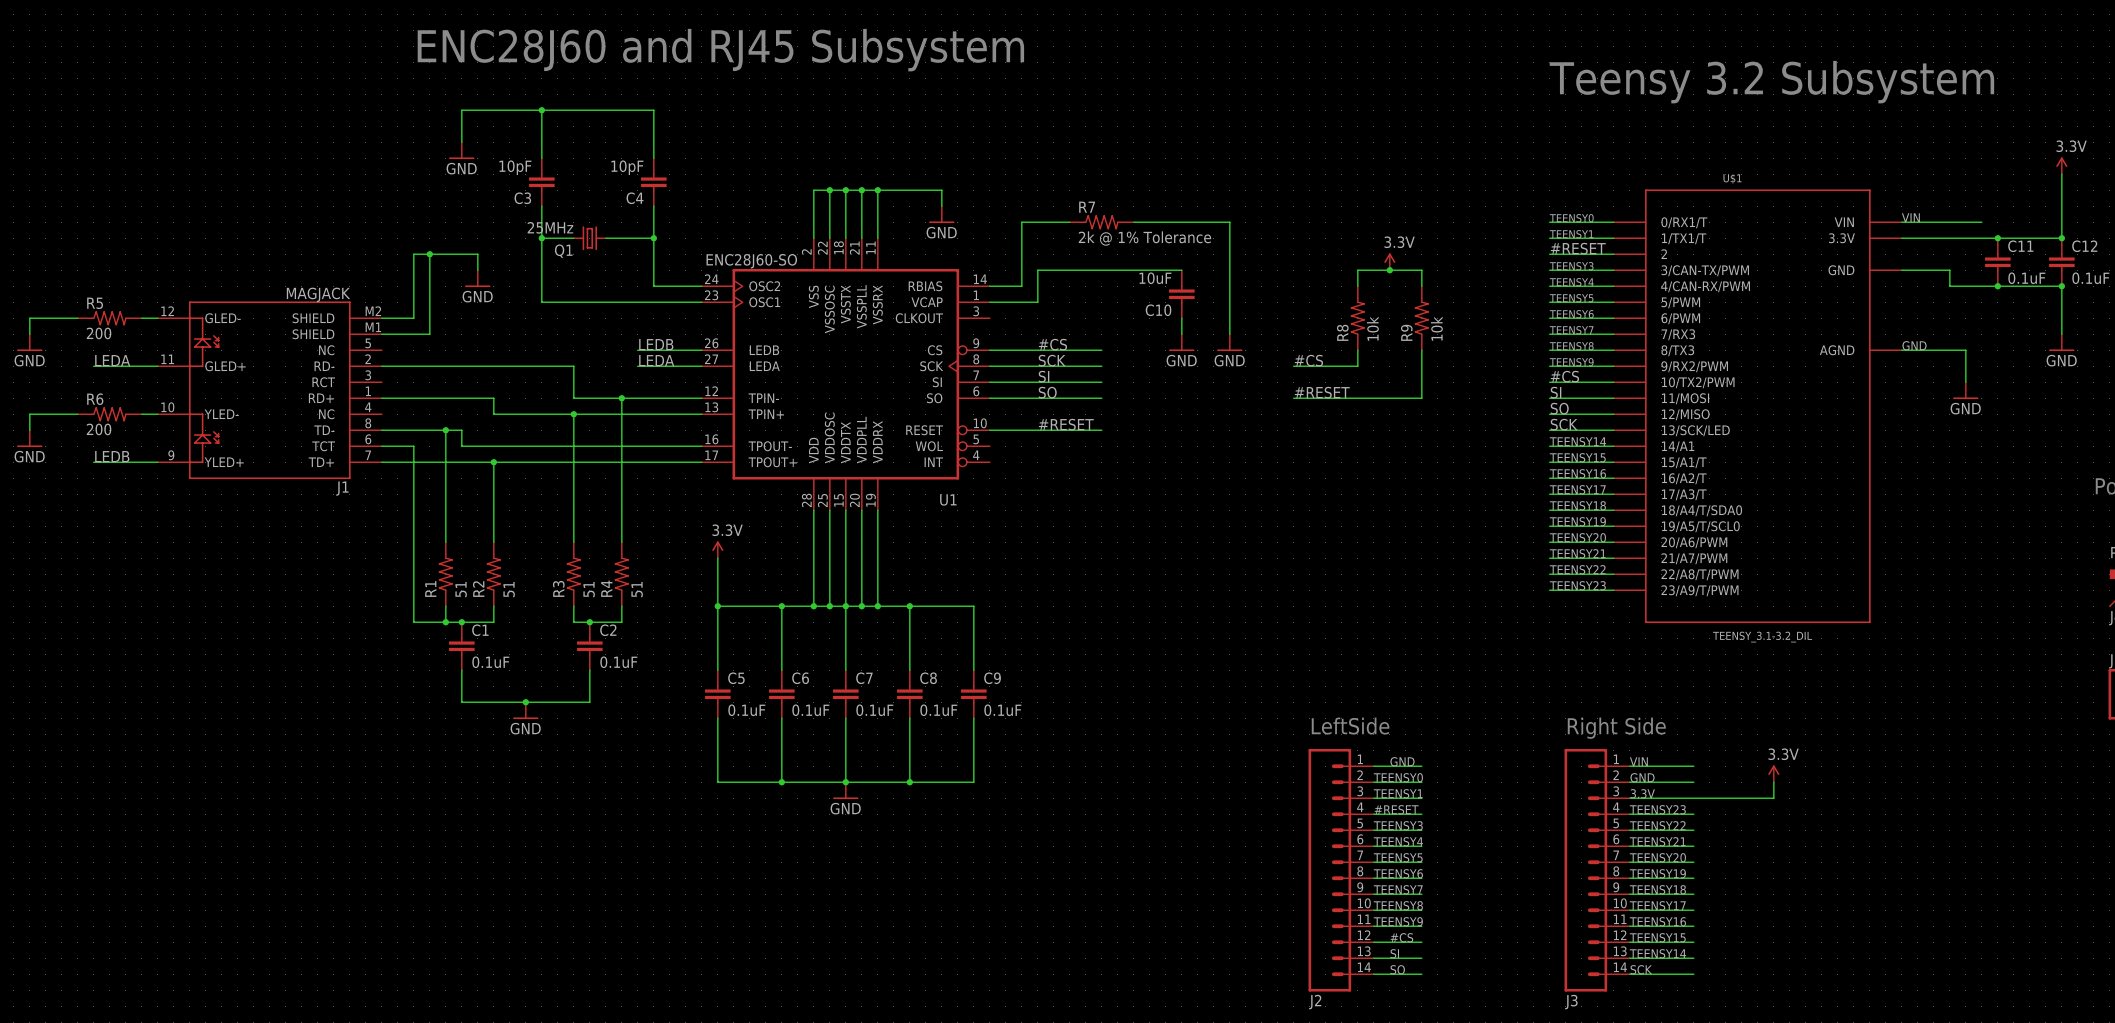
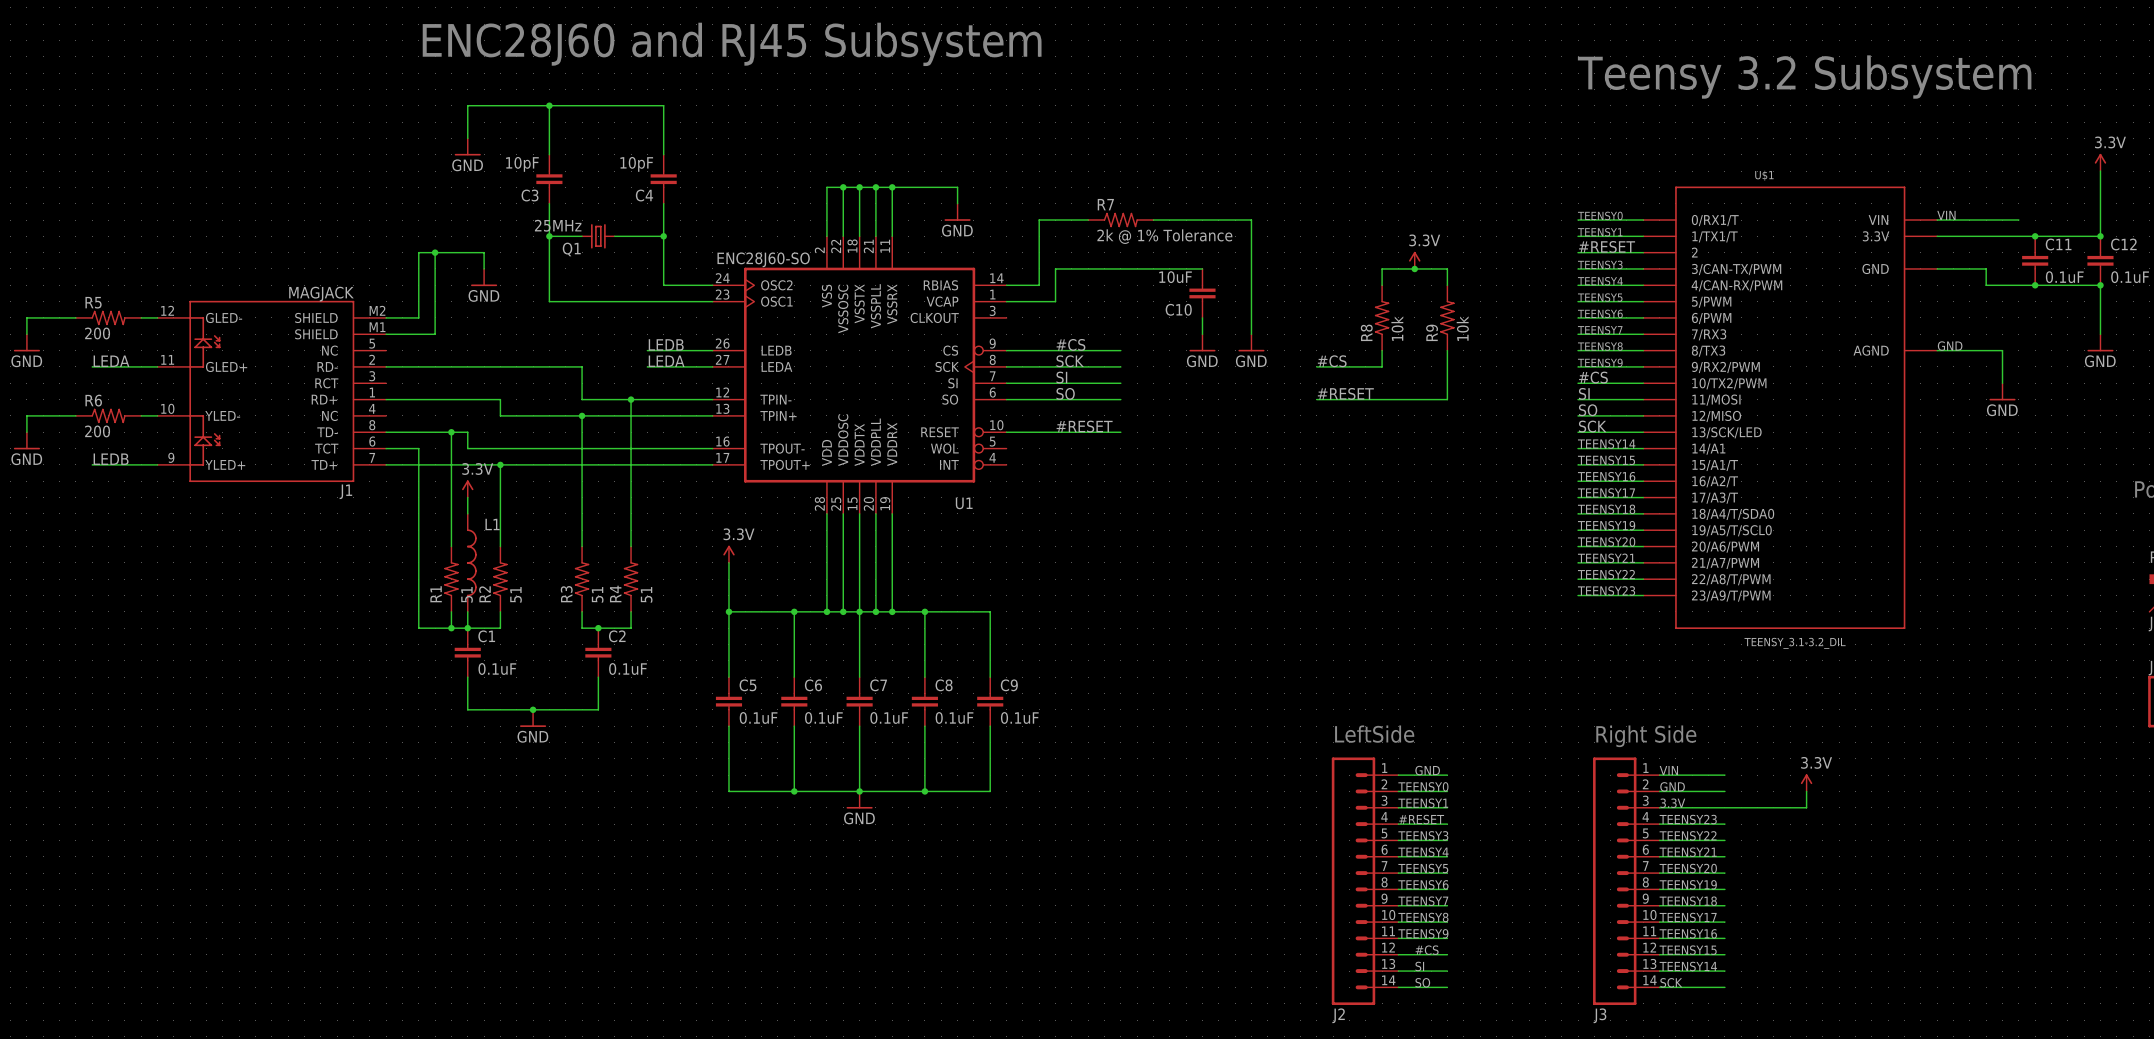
power symbol: none -> 3.3V (467, 488)
wire: none -> (467, 497) (467, 513)
L1: none -> (471, 562)
wire: none -> (467, 611) (467, 628)

